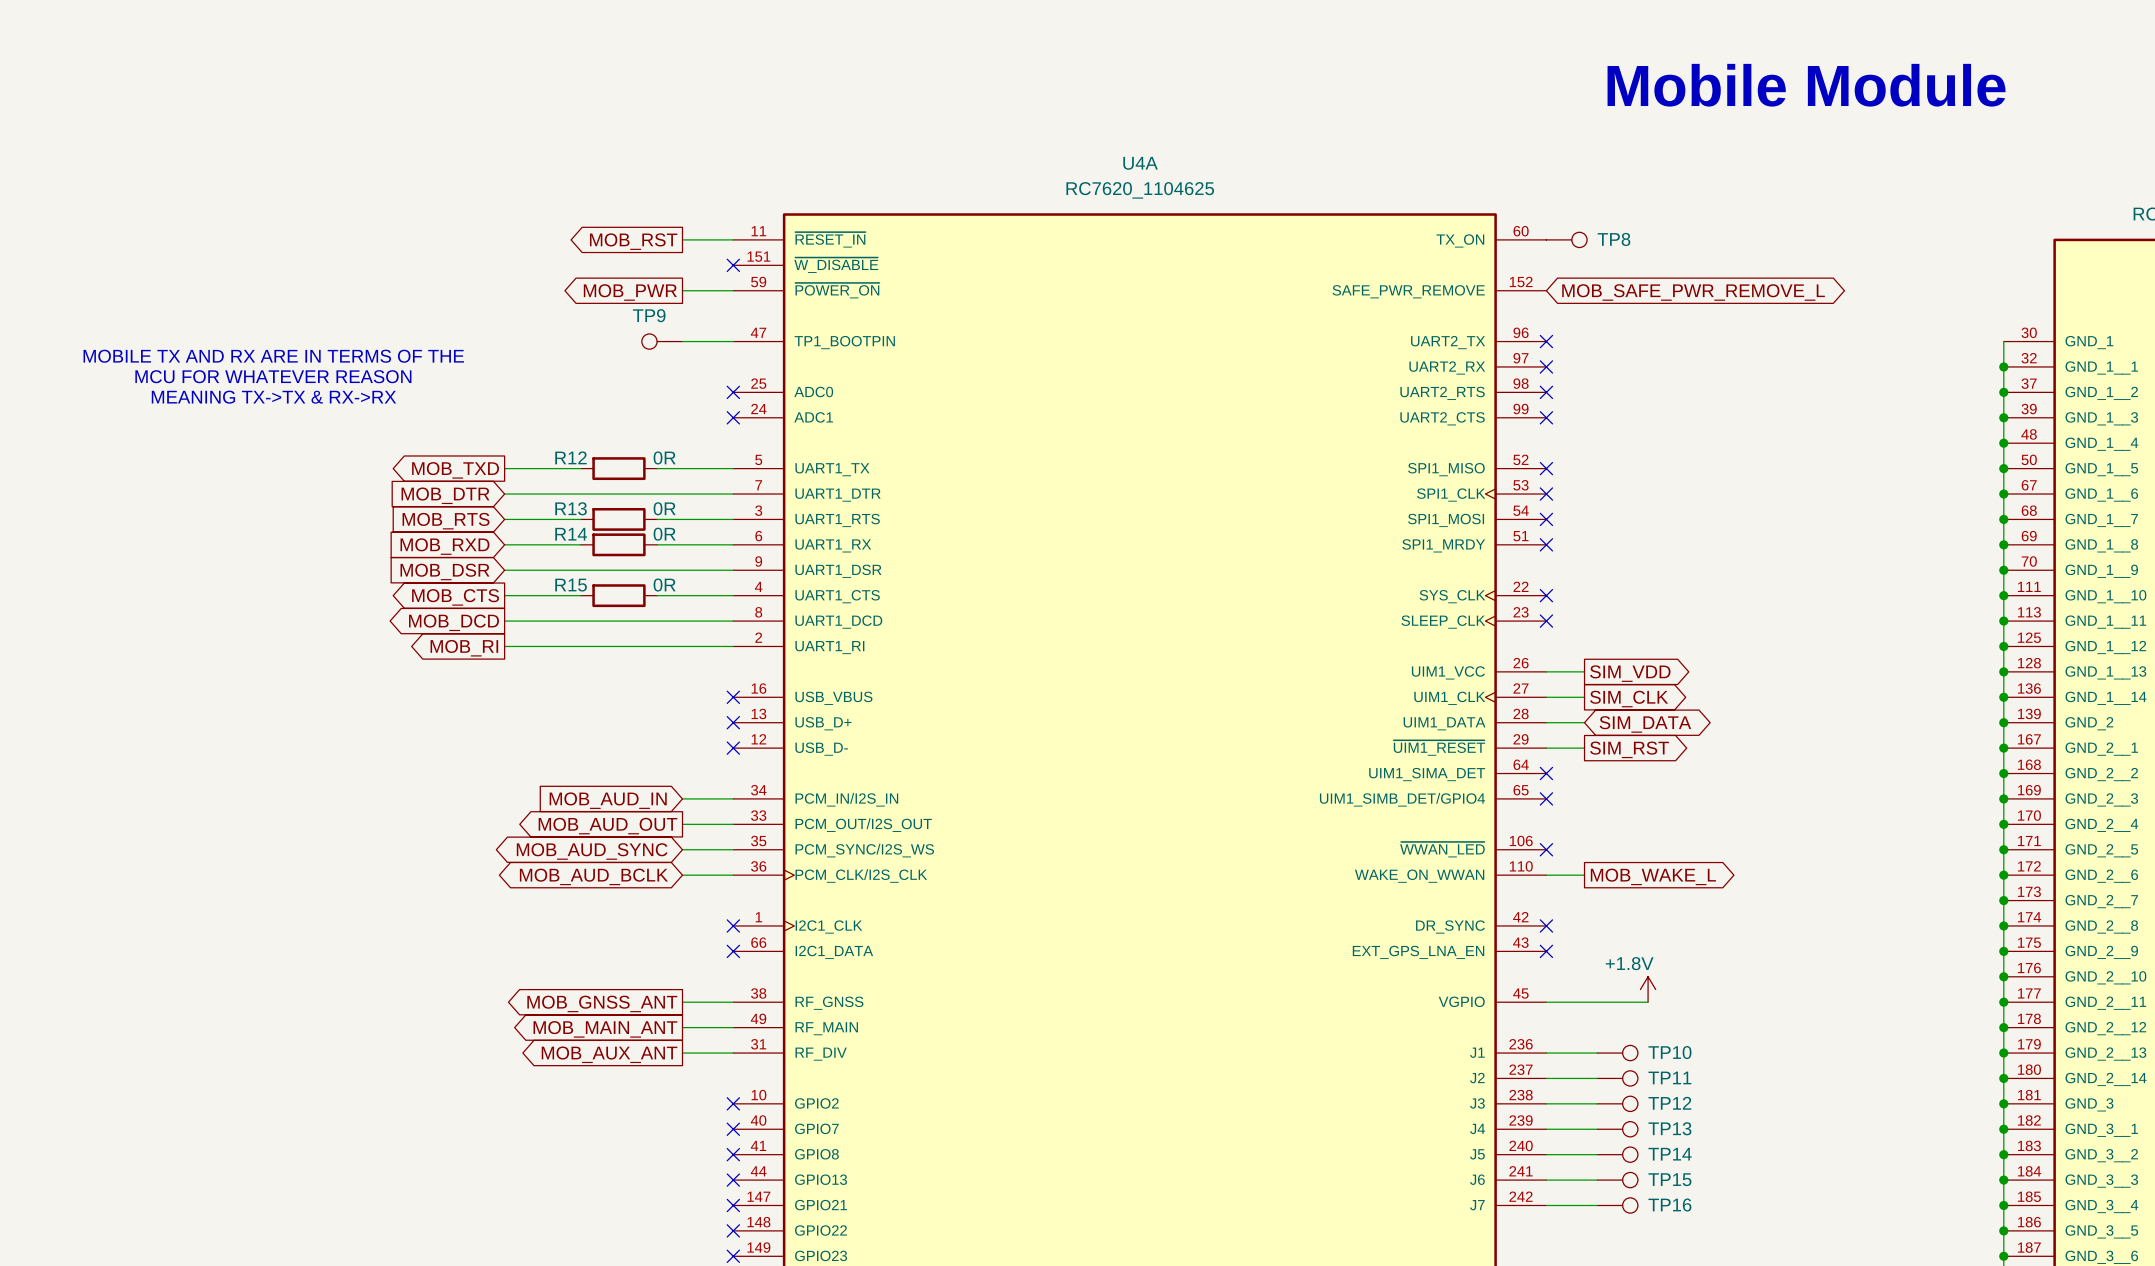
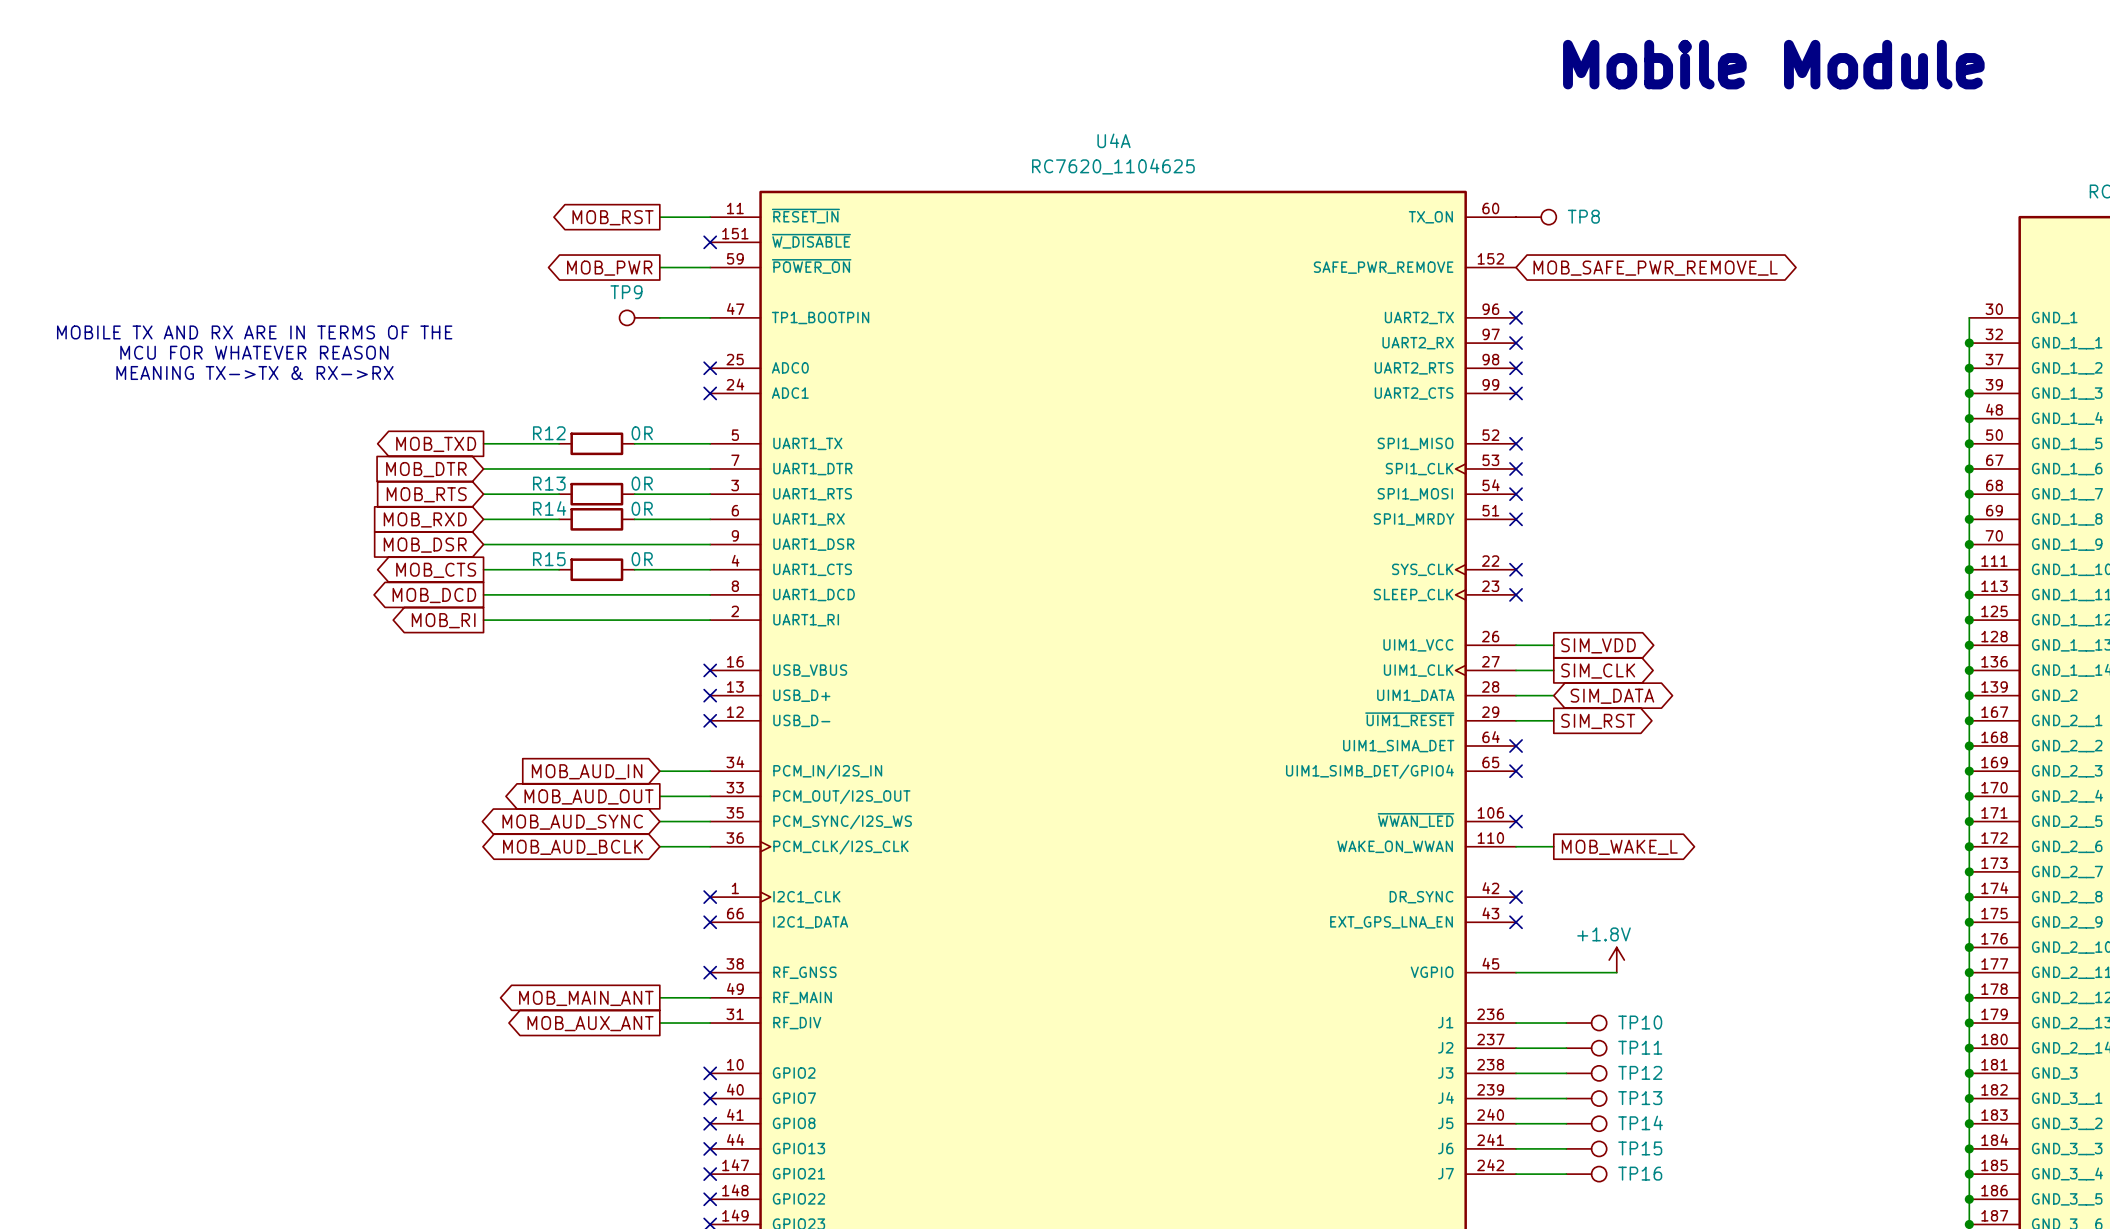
wire: (682, 1002) (733, 1002) -> none
no-connect mark: none -> (710, 972)
global label: MOB_GNSS_ANT (602, 1003) -> none

